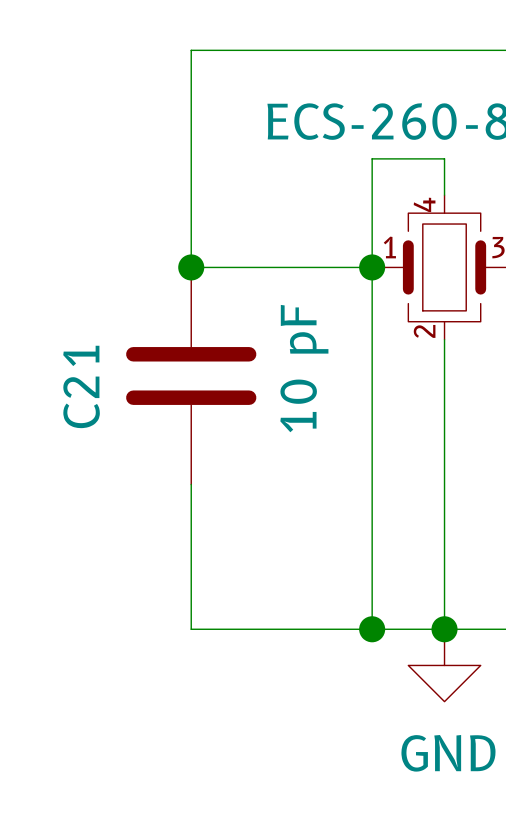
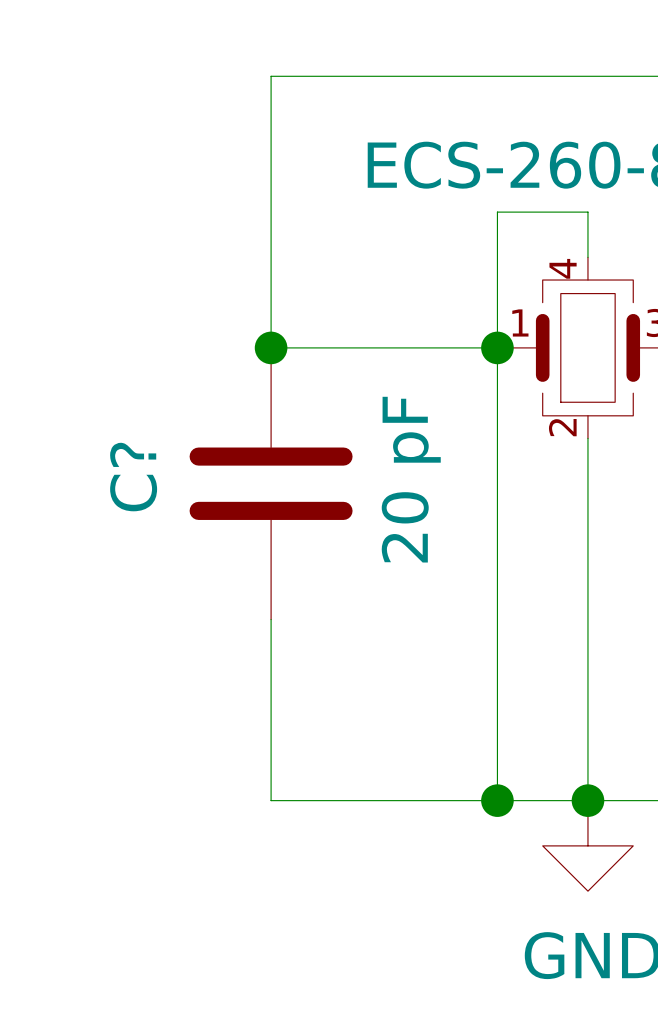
C21 value: 10 pF (304, 368) -> 20 pF (411, 479)
C21 name: C21 (81, 386) -> C? (133, 477)

